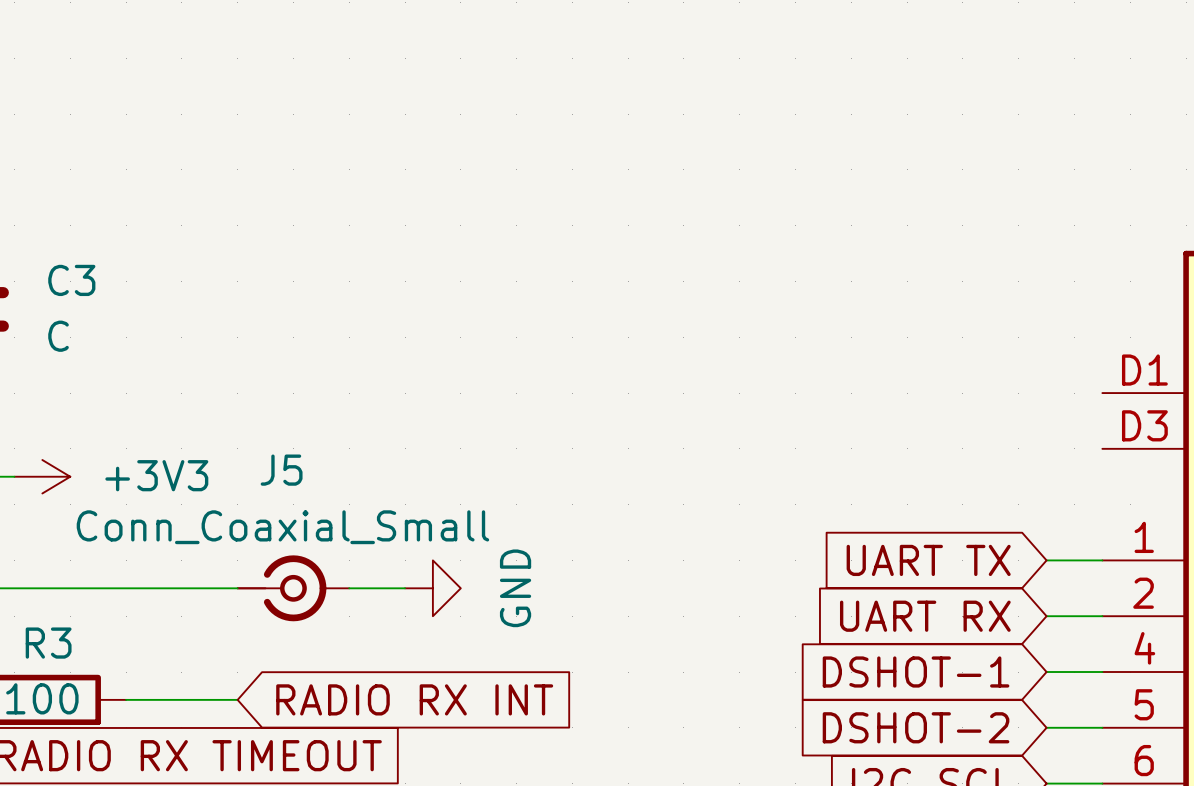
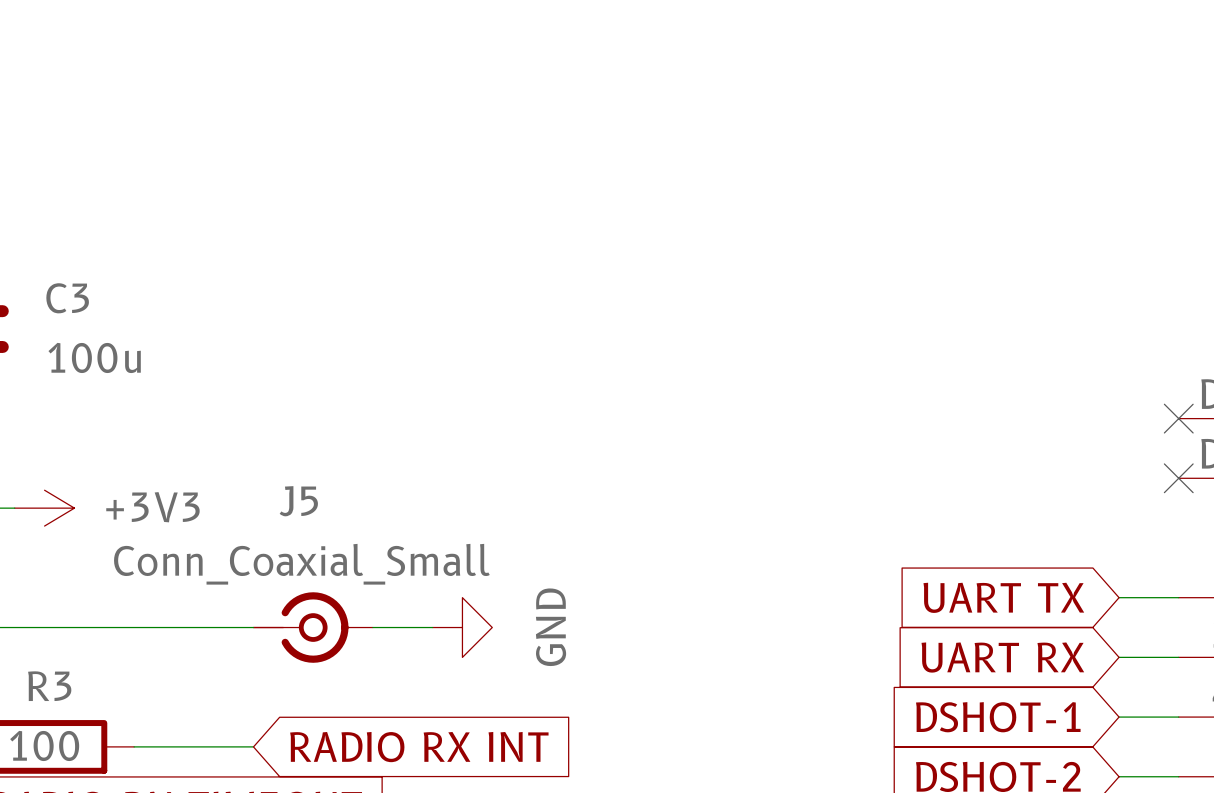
C3 value: C (58, 336) -> 100u (94, 357)
no-connect mark: none -> (1178, 418)
no-connect mark: none -> (1178, 478)

